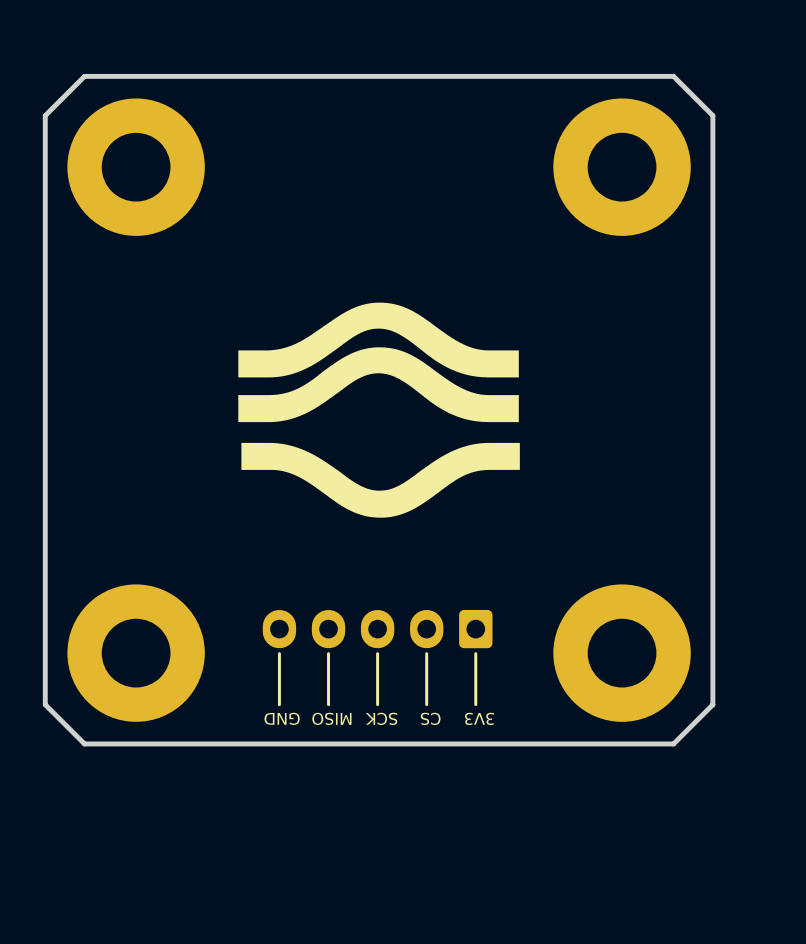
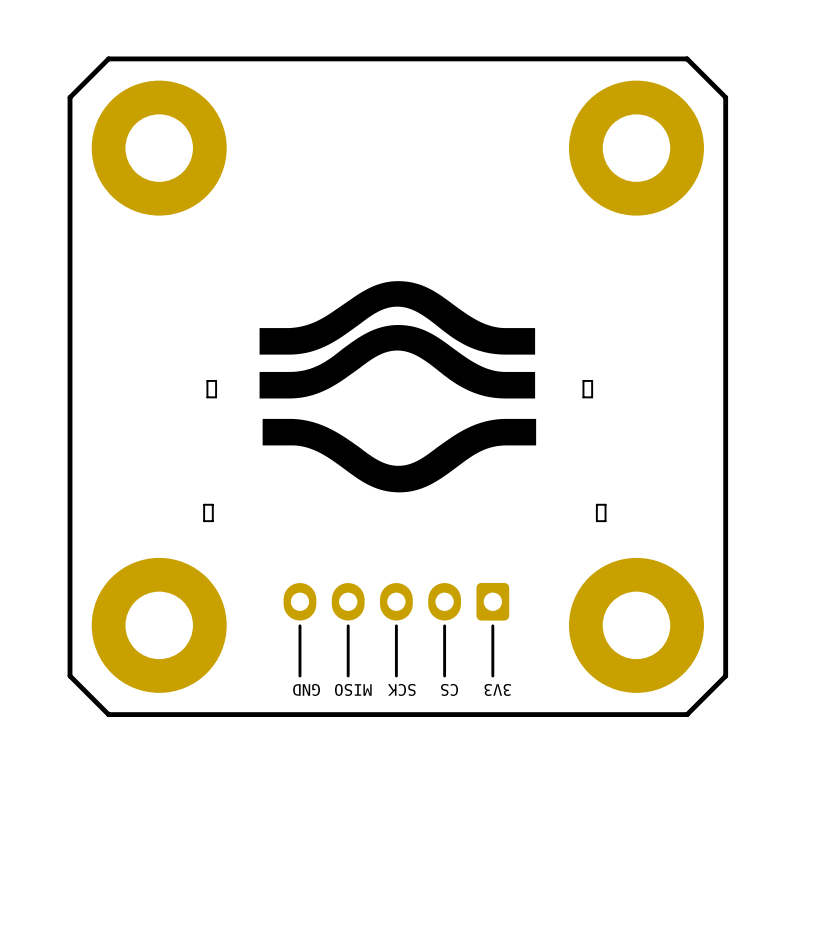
board edge: none -> (216, 380) (207, 380) (207, 397) (216, 397) (216, 380)
board edge: none -> (592, 380) (583, 380) (583, 397) (592, 397) (592, 380)
board edge: none -> (212, 504) (204, 504) (204, 521) (212, 521) (212, 504)
board edge: none -> (605, 504) (596, 504) (596, 521) (605, 521) (605, 504)

